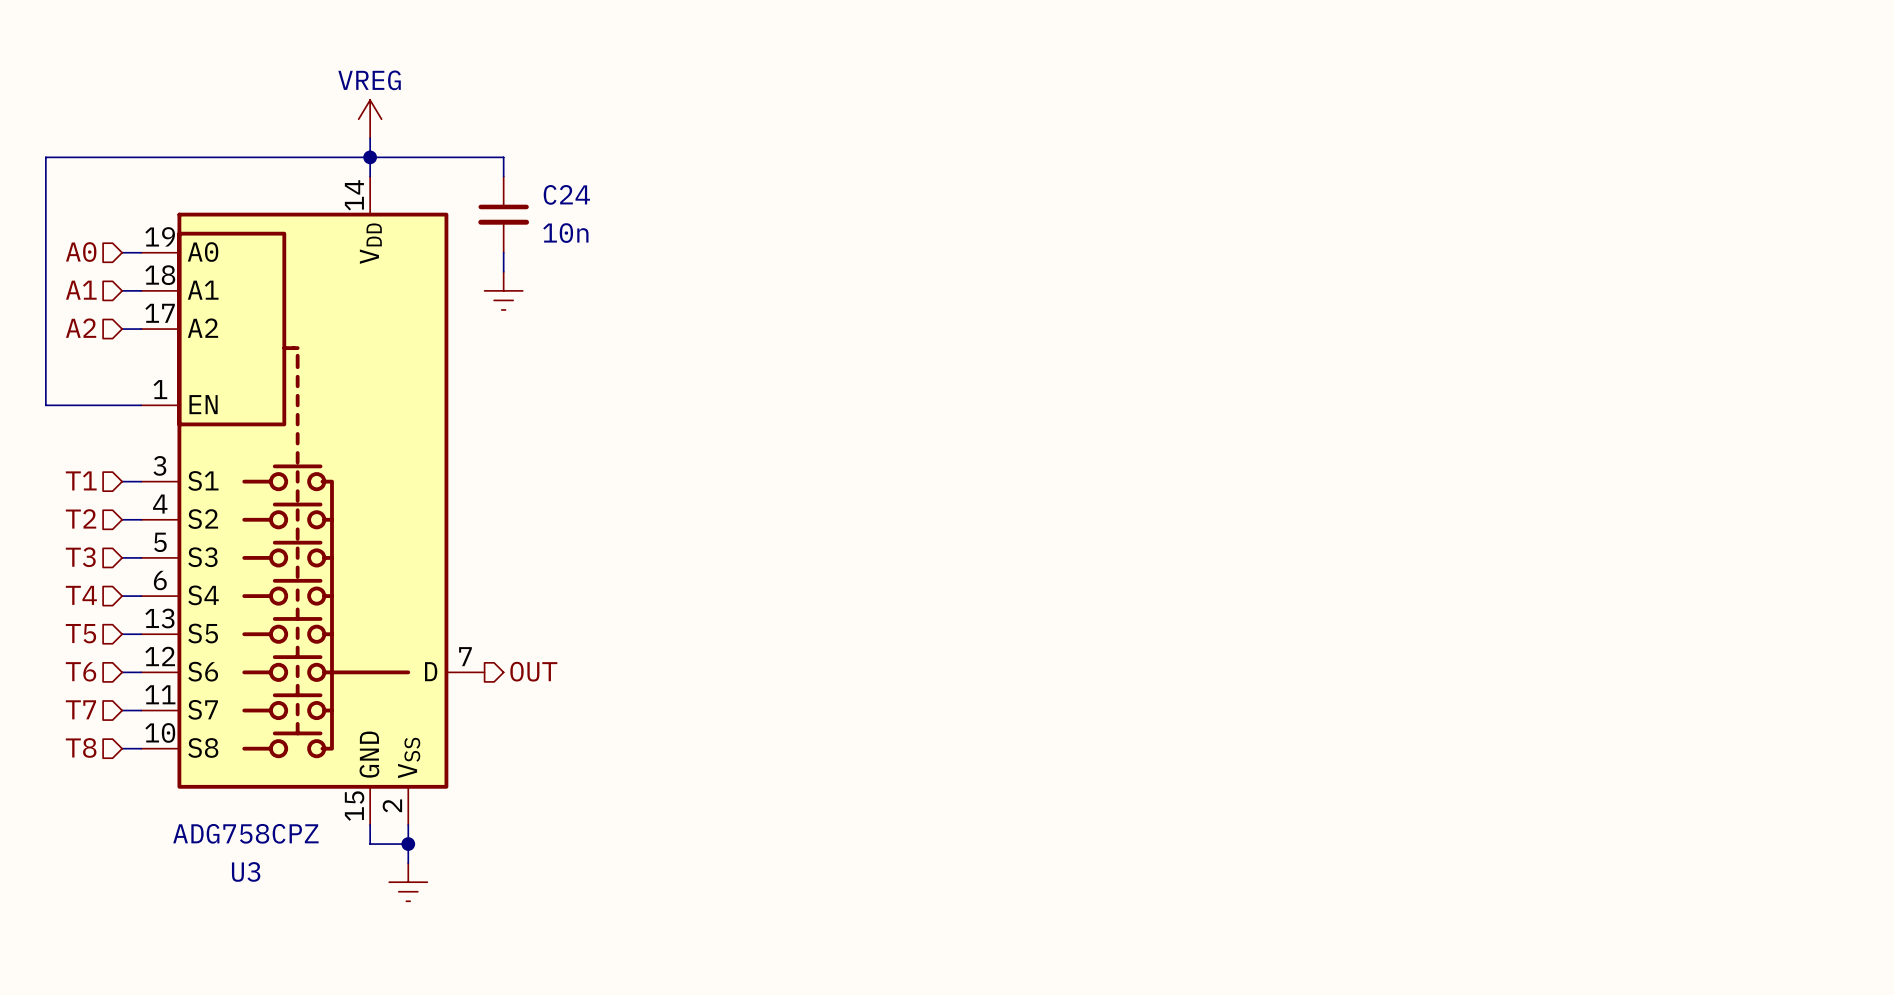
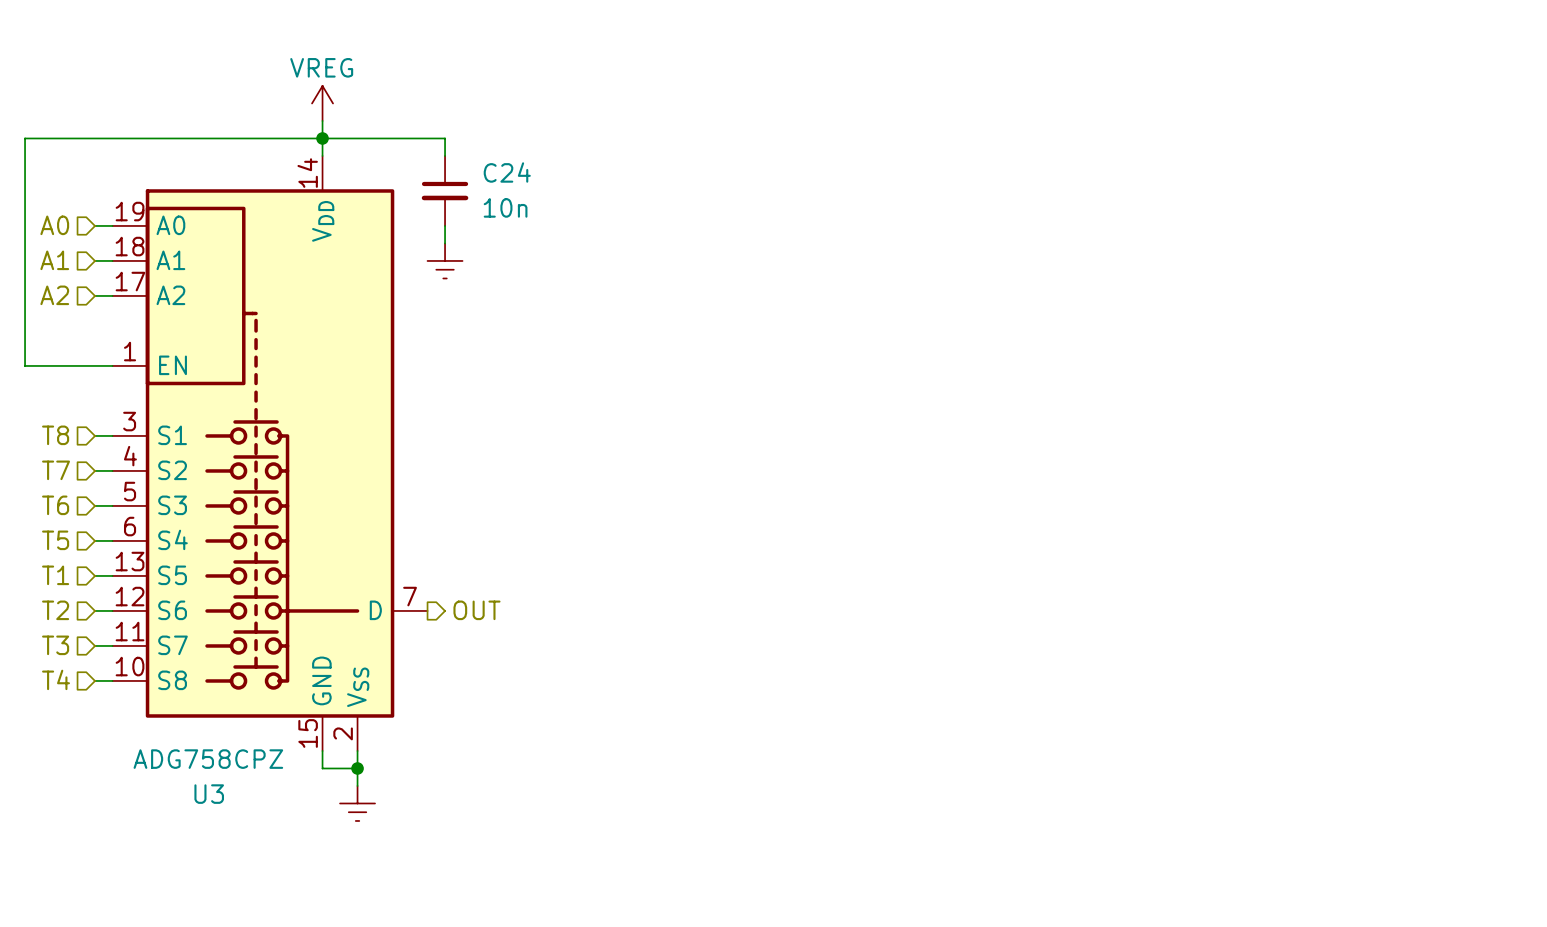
hierarchical label: T1 (81, 480) -> T8 (55, 435)
hierarchical label: T2 (81, 518) -> T7 (56, 470)
hierarchical label: T3 (80, 557) -> T6 (55, 505)
hierarchical label: T4 (81, 595) -> T5 (55, 540)
hierarchical label: T5 (80, 633) -> T1 (55, 575)
hierarchical label: T6 (81, 671) -> T2 (55, 610)
hierarchical label: T7 (80, 709) -> T3 (55, 645)
hierarchical label: T8 (81, 747) -> T4 (56, 679)

